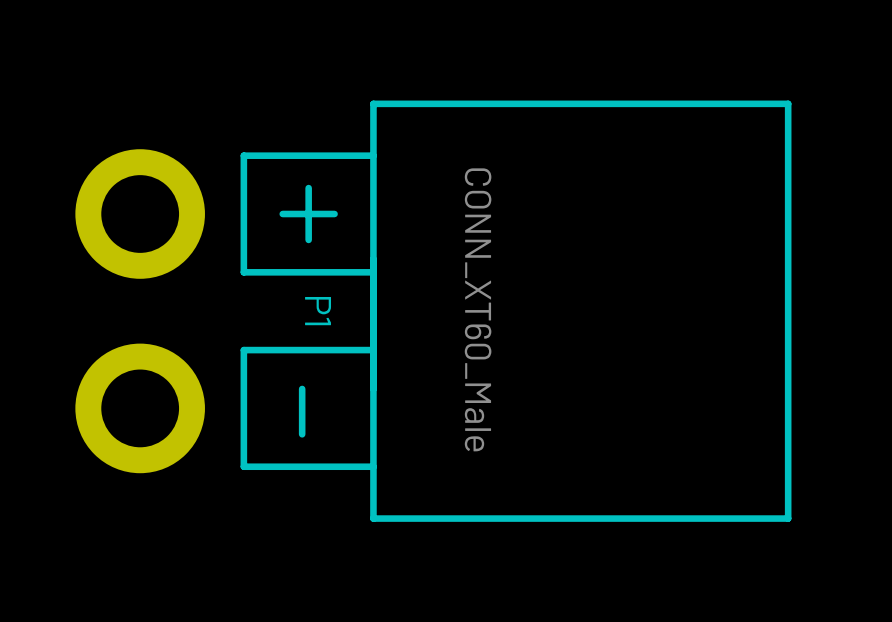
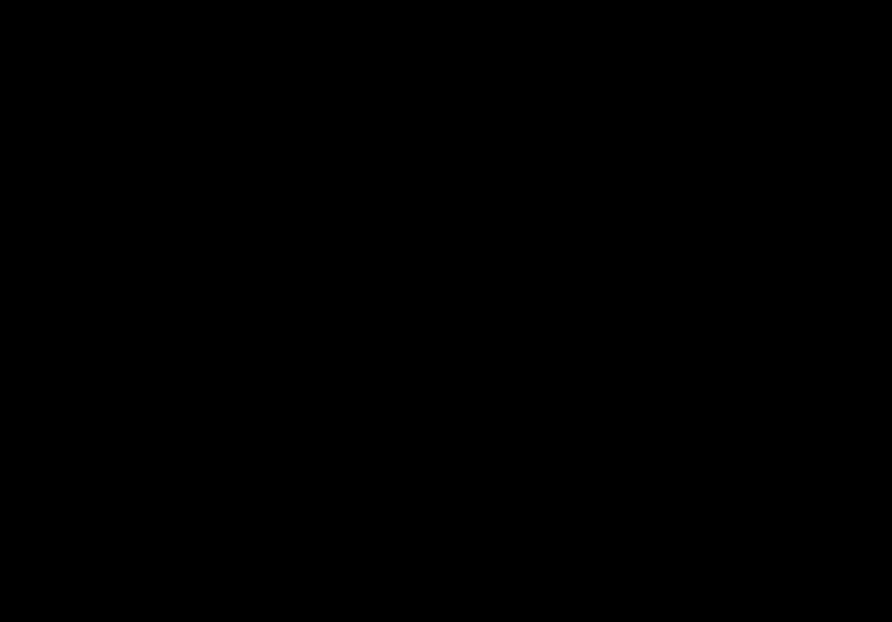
P1: CONN_XT60_Male (433, 311) -> none

